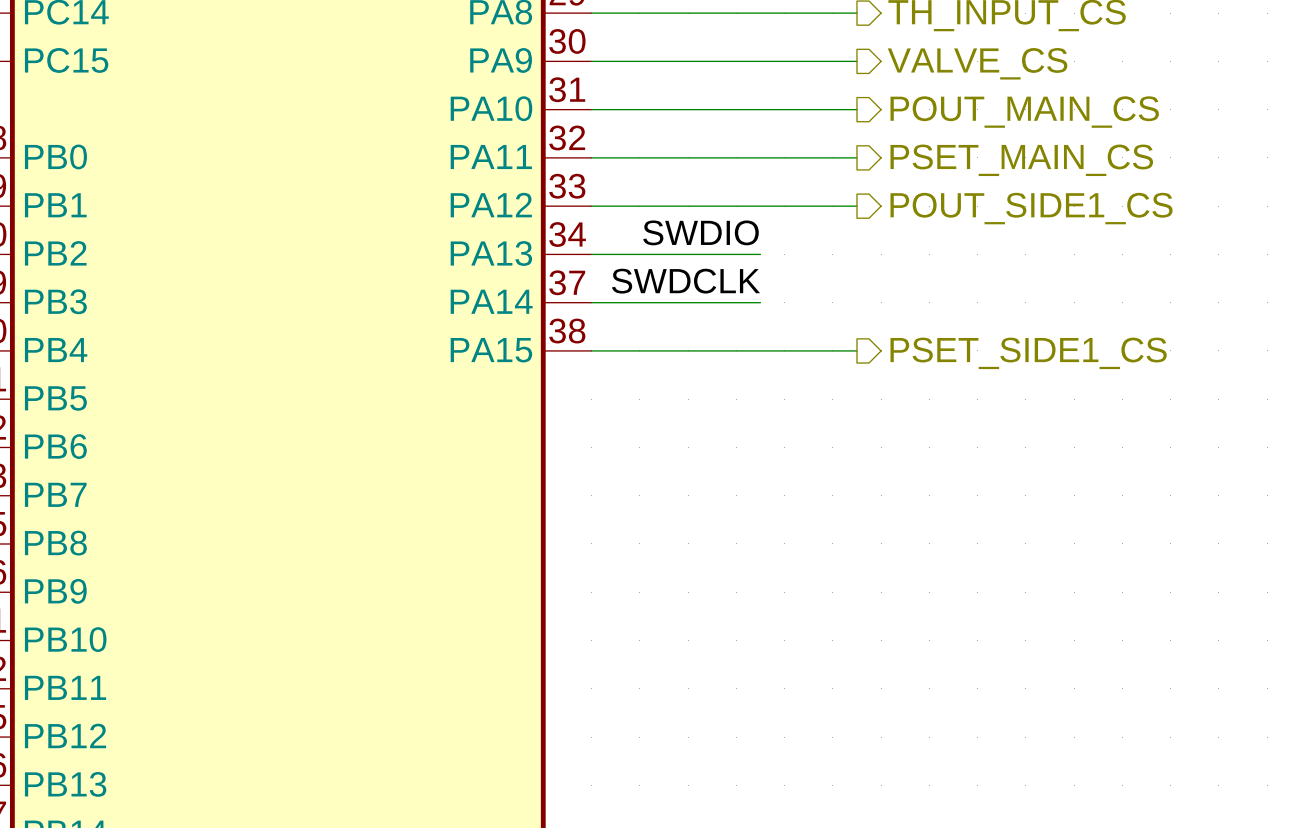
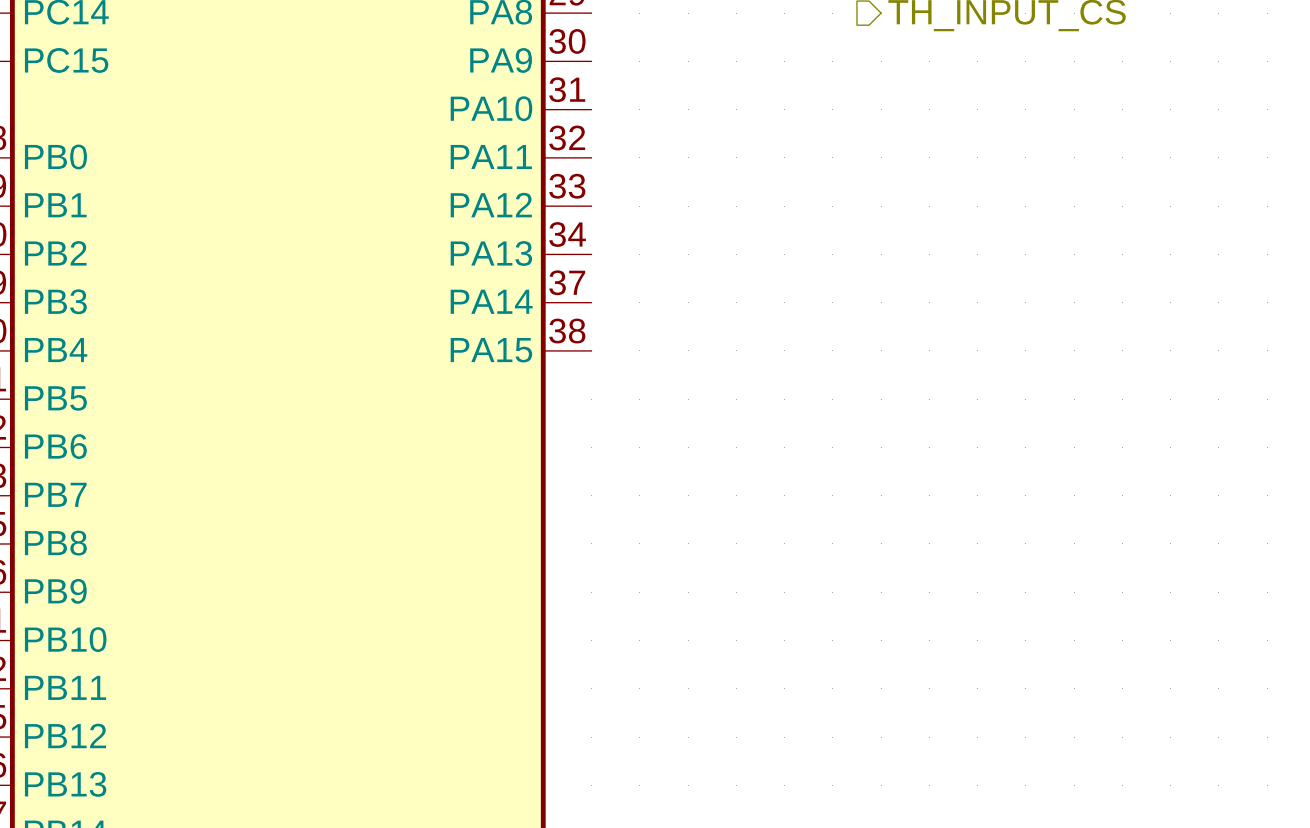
wire: (591, 13) (856, 13) -> none
wire: (591, 61) (856, 61) -> none
hierarchical label: VALVE_CS (977, 63) -> none
wire: (591, 109) (856, 109) -> none
hierarchical label: POUT_MAIN_CS (1024, 112) -> none
wire: (591, 157) (856, 157) -> none
hierarchical label: PSET_MAIN_CS (1021, 160) -> none
wire: (591, 206) (856, 206) -> none
hierarchical label: POUT_SIDE1_CS (1031, 208) -> none
label: SWDIO (700, 232) -> none
wire: (591, 254) (760, 254) -> none
label: SWDCLK (686, 281) -> none
wire: (591, 302) (760, 302) -> none
wire: (591, 350) (856, 350) -> none
hierarchical label: PSET_SIDE1_CS (1028, 353) -> none

